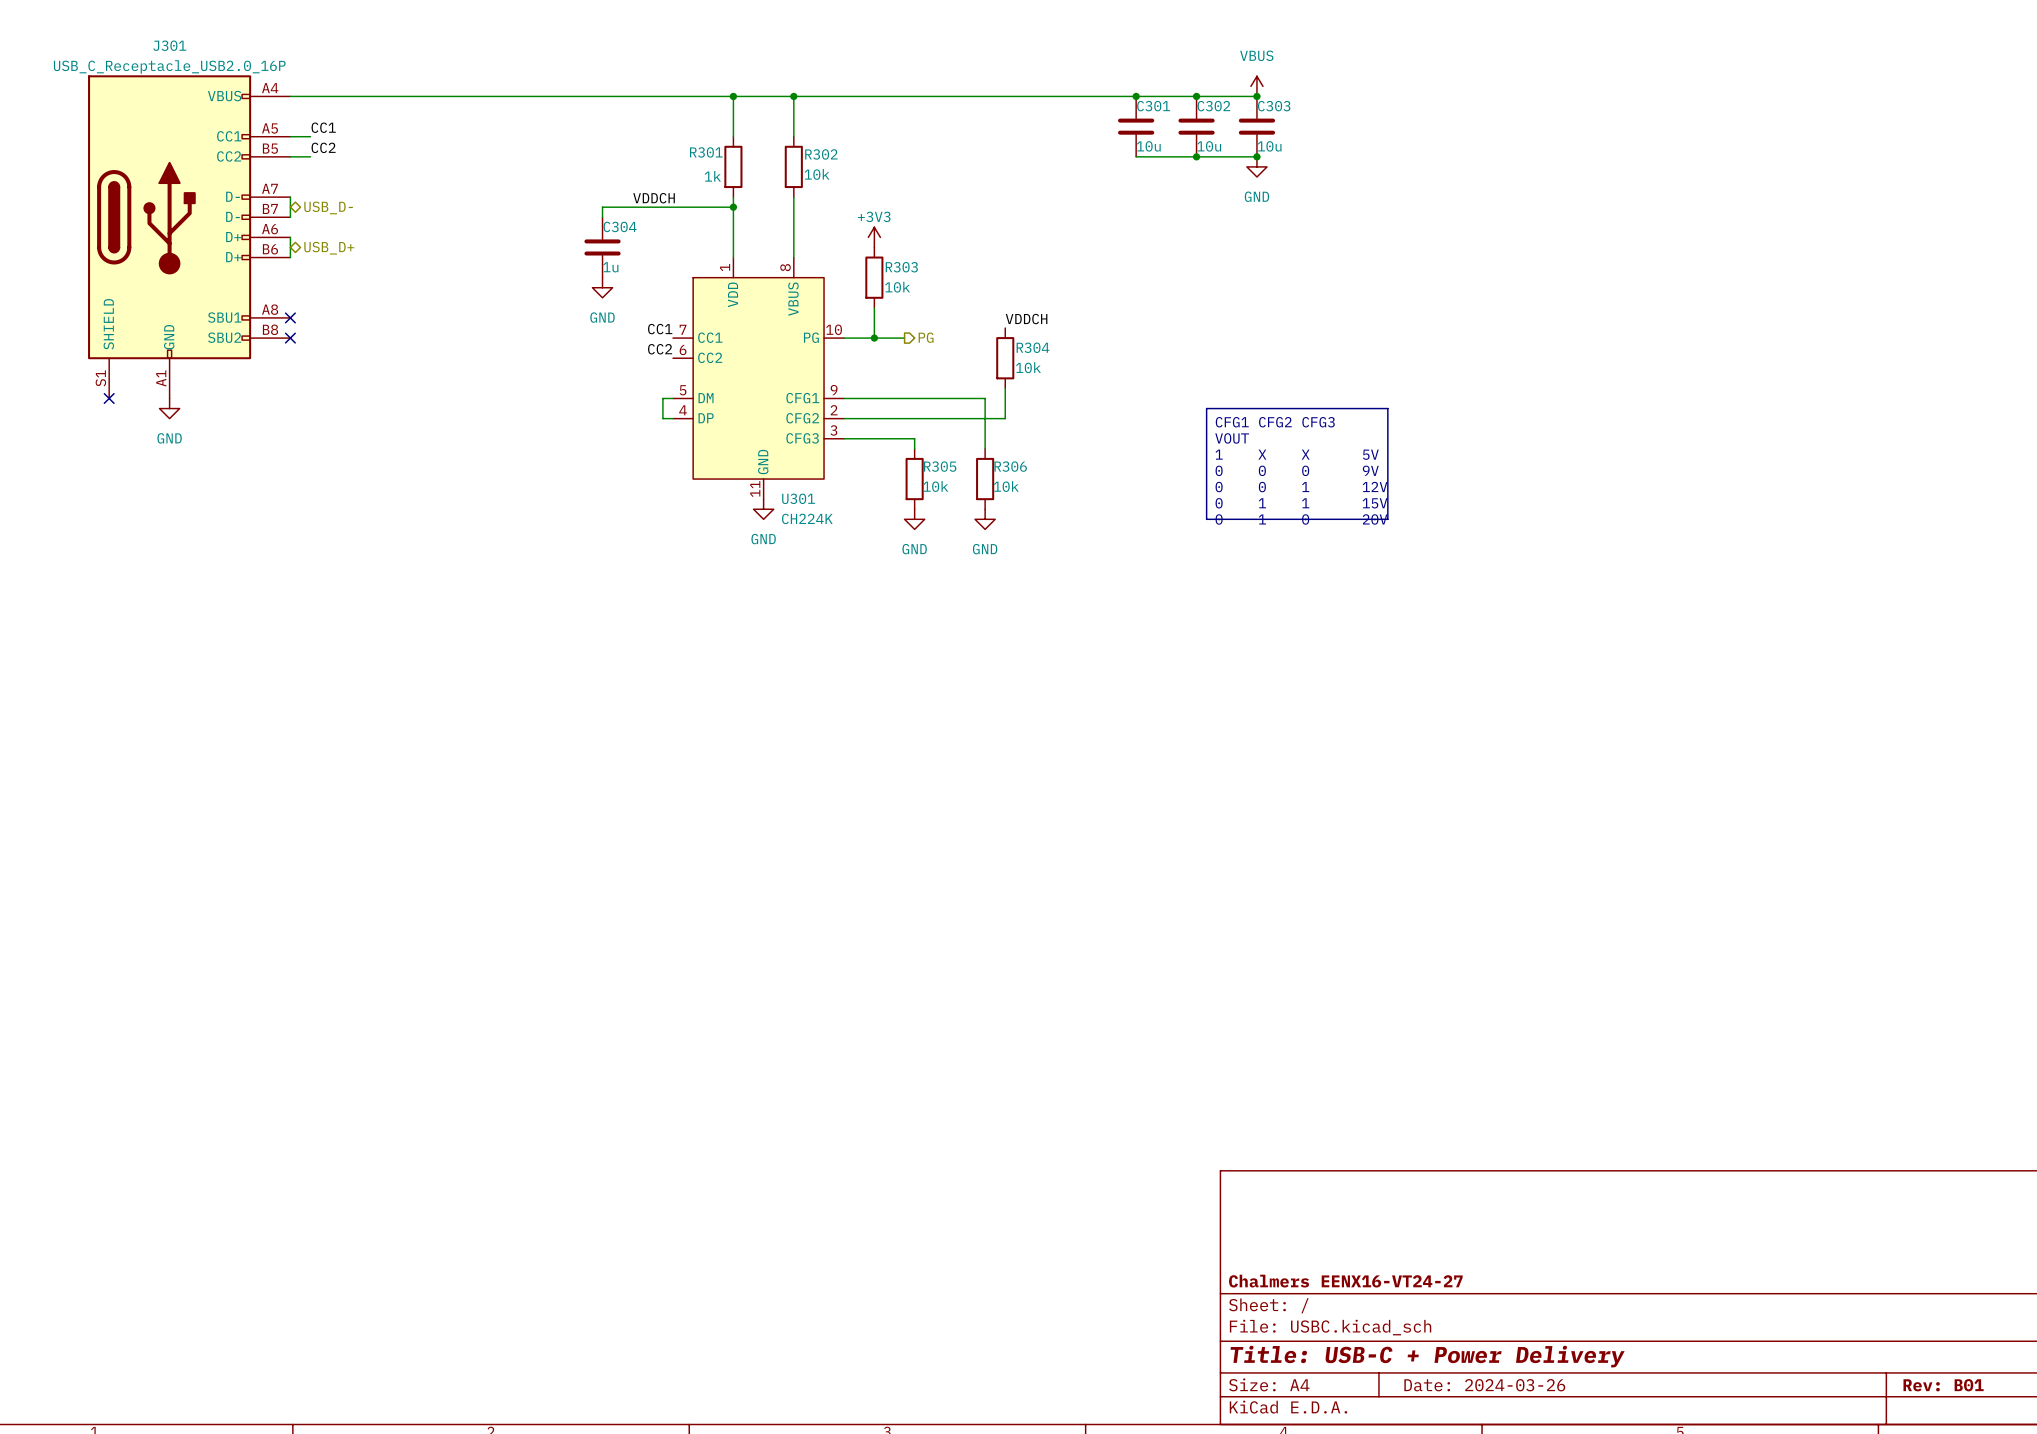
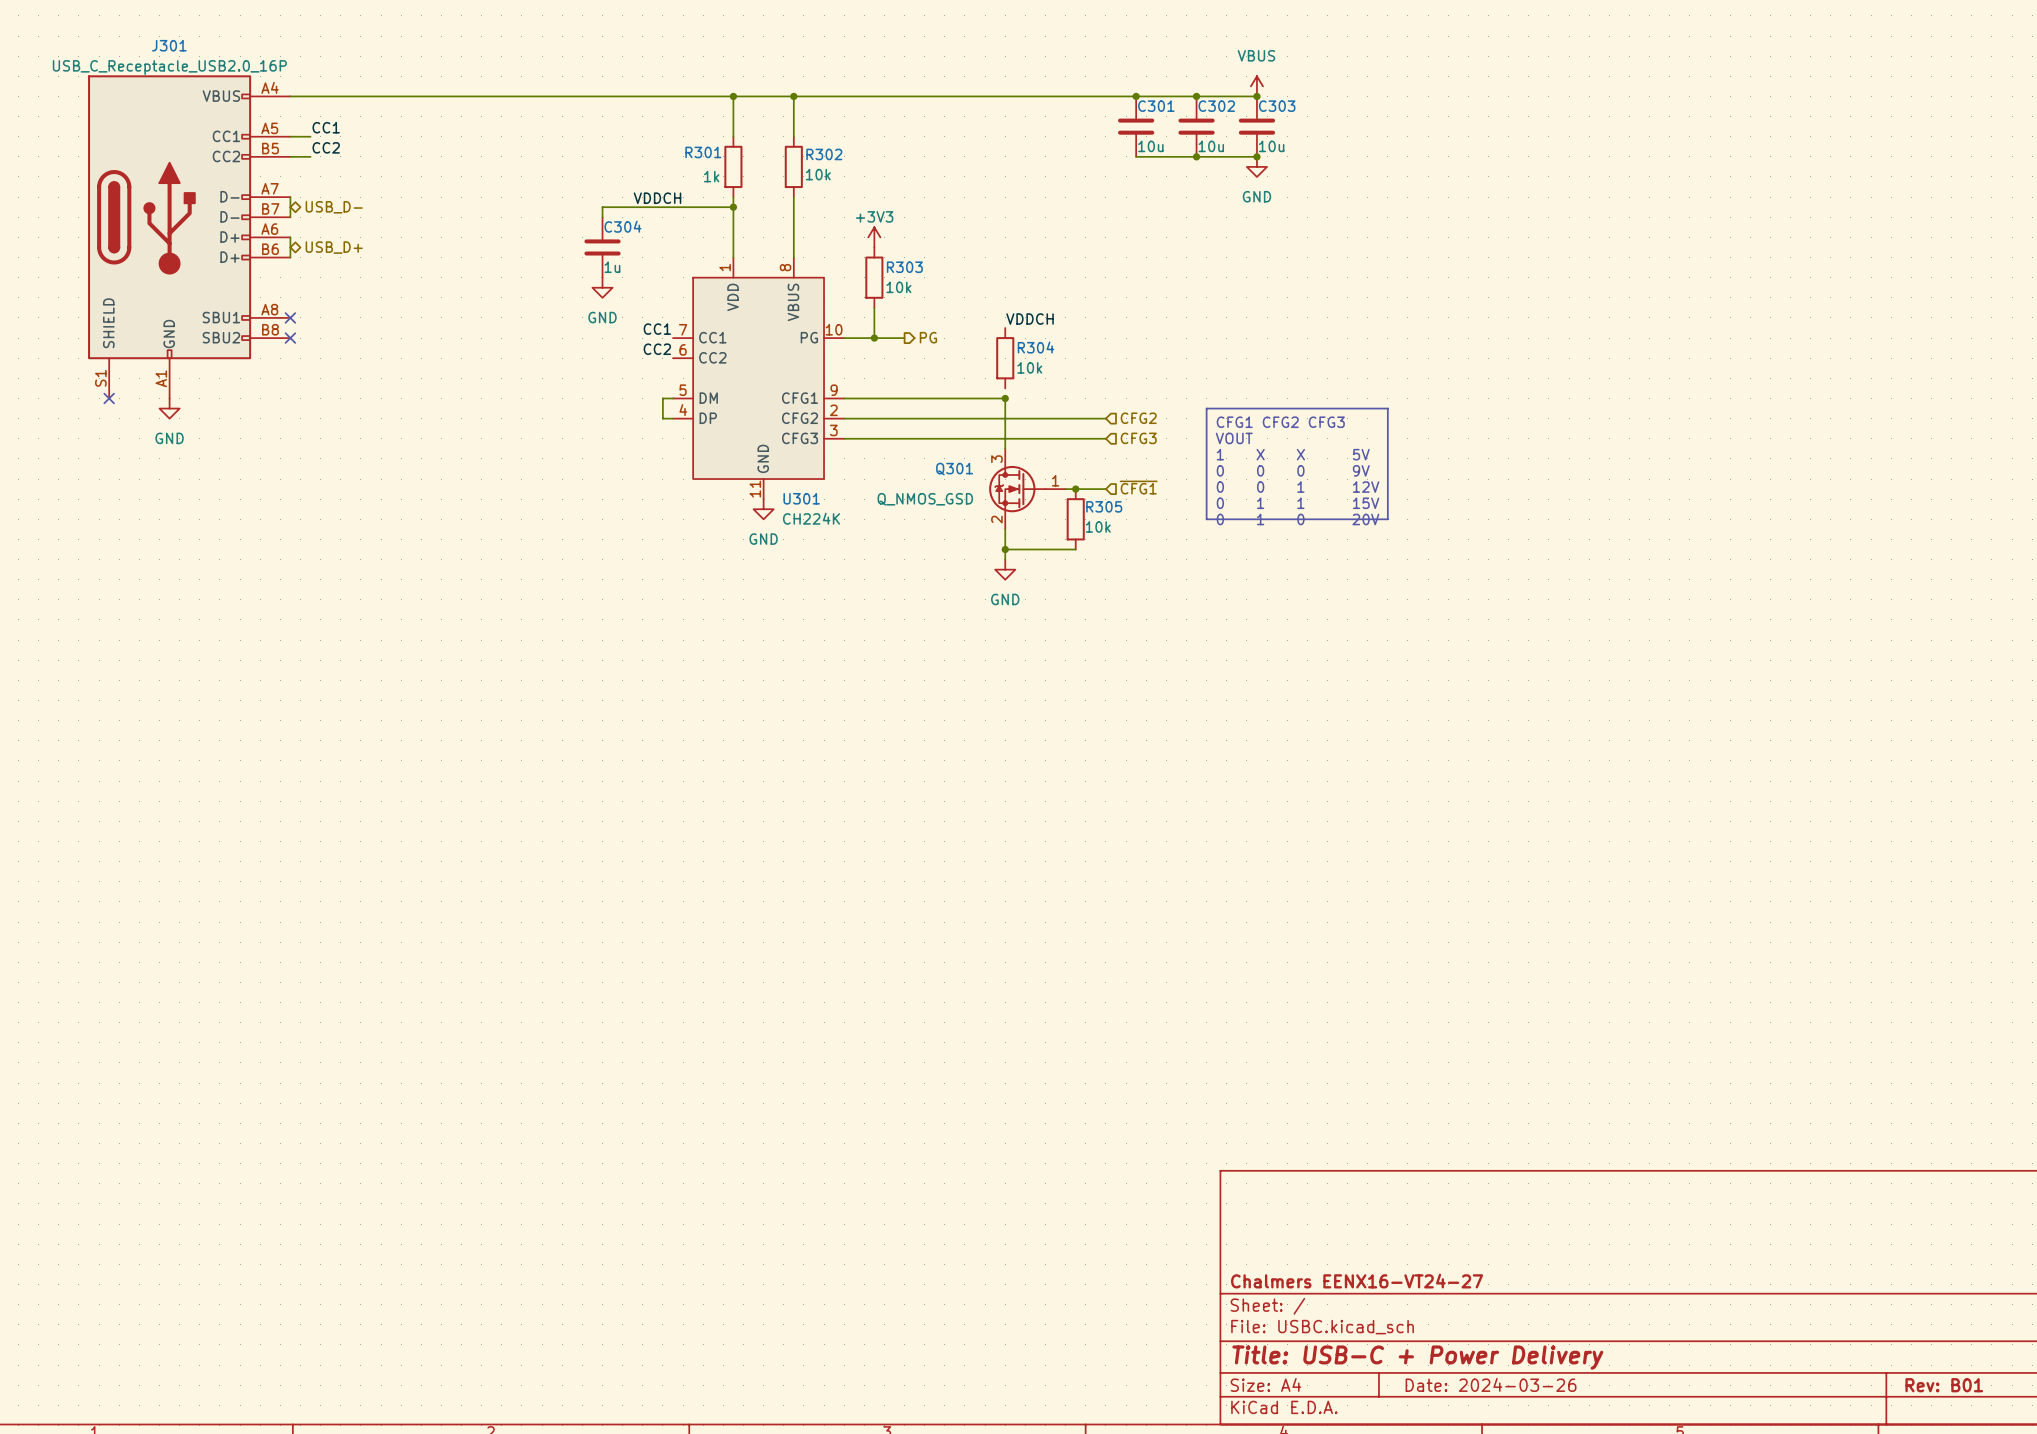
wire: (1005, 388) (1005, 398) -> (985, 398) (1005, 398)
wire: (985, 398) (985, 448) -> none
junction: none -> (1005, 398)
wire: none -> (1105, 418) (1005, 418) (1005, 448)
hierarchical label: none -> CFG2 (1138, 418)
wire: (914, 438) (914, 448) -> (914, 438) (1105, 438)
hierarchical label: none -> CFG3 (1138, 438)
R305 position: (914, 479) -> (1075, 519)
R306: 10k (985, 479) -> none
hierarchical label: none -> ~{CFG1} (1138, 487)
Q301: none -> Q_NMOS_GSD (1027, 489)
wire: none -> (1065, 489) (1105, 489)
junction: none -> (1075, 489)
power symbol: GND (914, 519) -> none
power symbol: GND (985, 519) -> none
wire: none -> (1005, 529) (1005, 559)
wire: none -> (1005, 549) (1075, 549)
junction: none -> (1005, 549)
power symbol: none -> GND (1005, 569)

